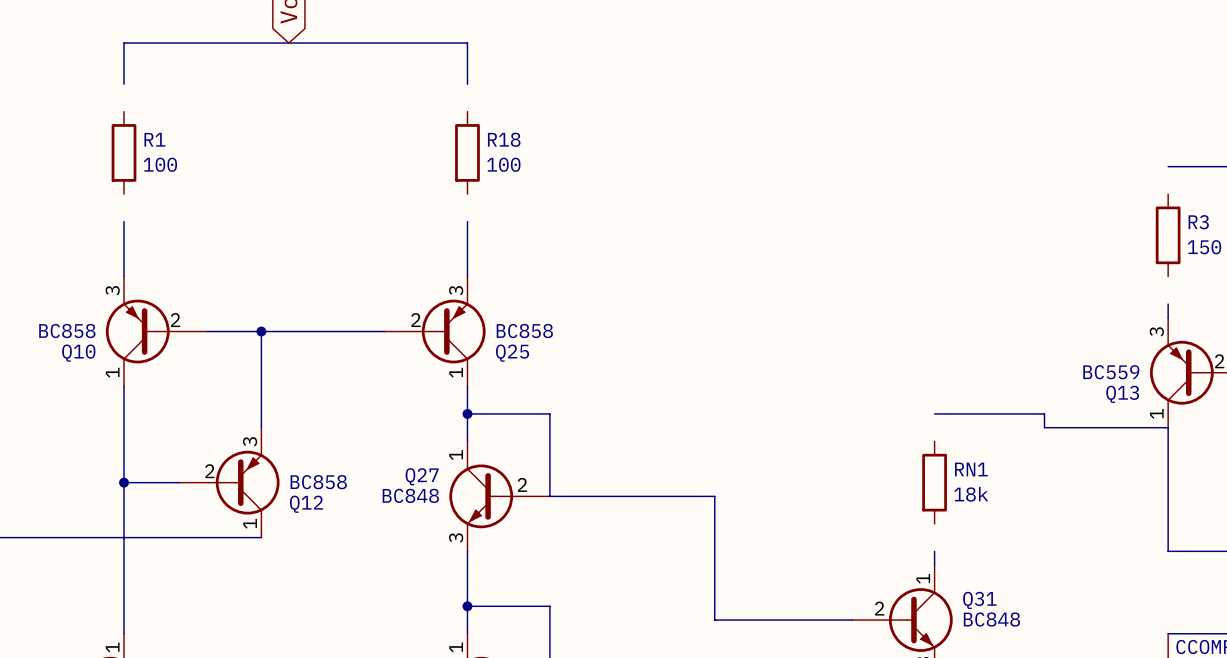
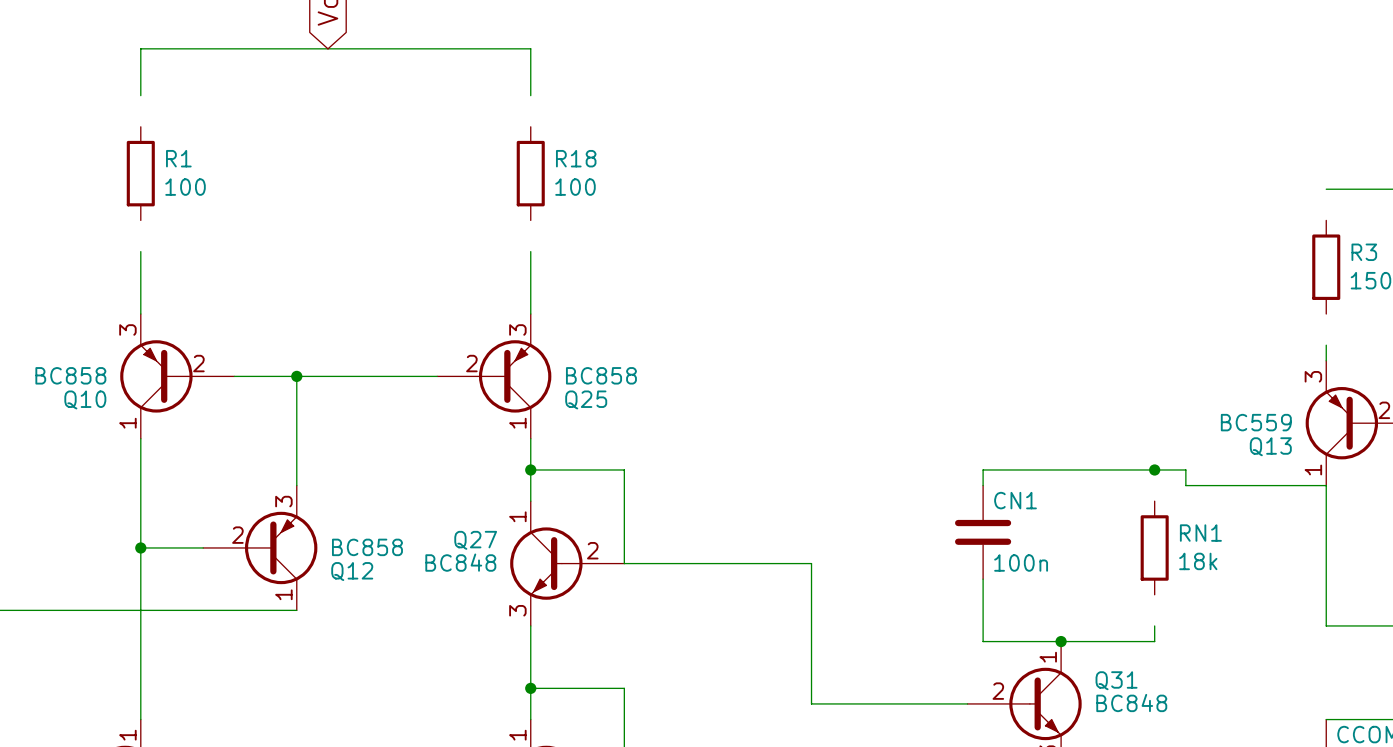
wire: none -> (1061, 469) (983, 469) (983, 485)
junction: none -> (1154, 469)
CN1: none -> 100n (983, 532)
RN1 position: (934, 482) -> (1154, 547)
wire: none -> (983, 579) (983, 641) (1154, 641) (1154, 625)
wire: (934, 551) (934, 565) -> none
junction: none -> (1061, 641)

